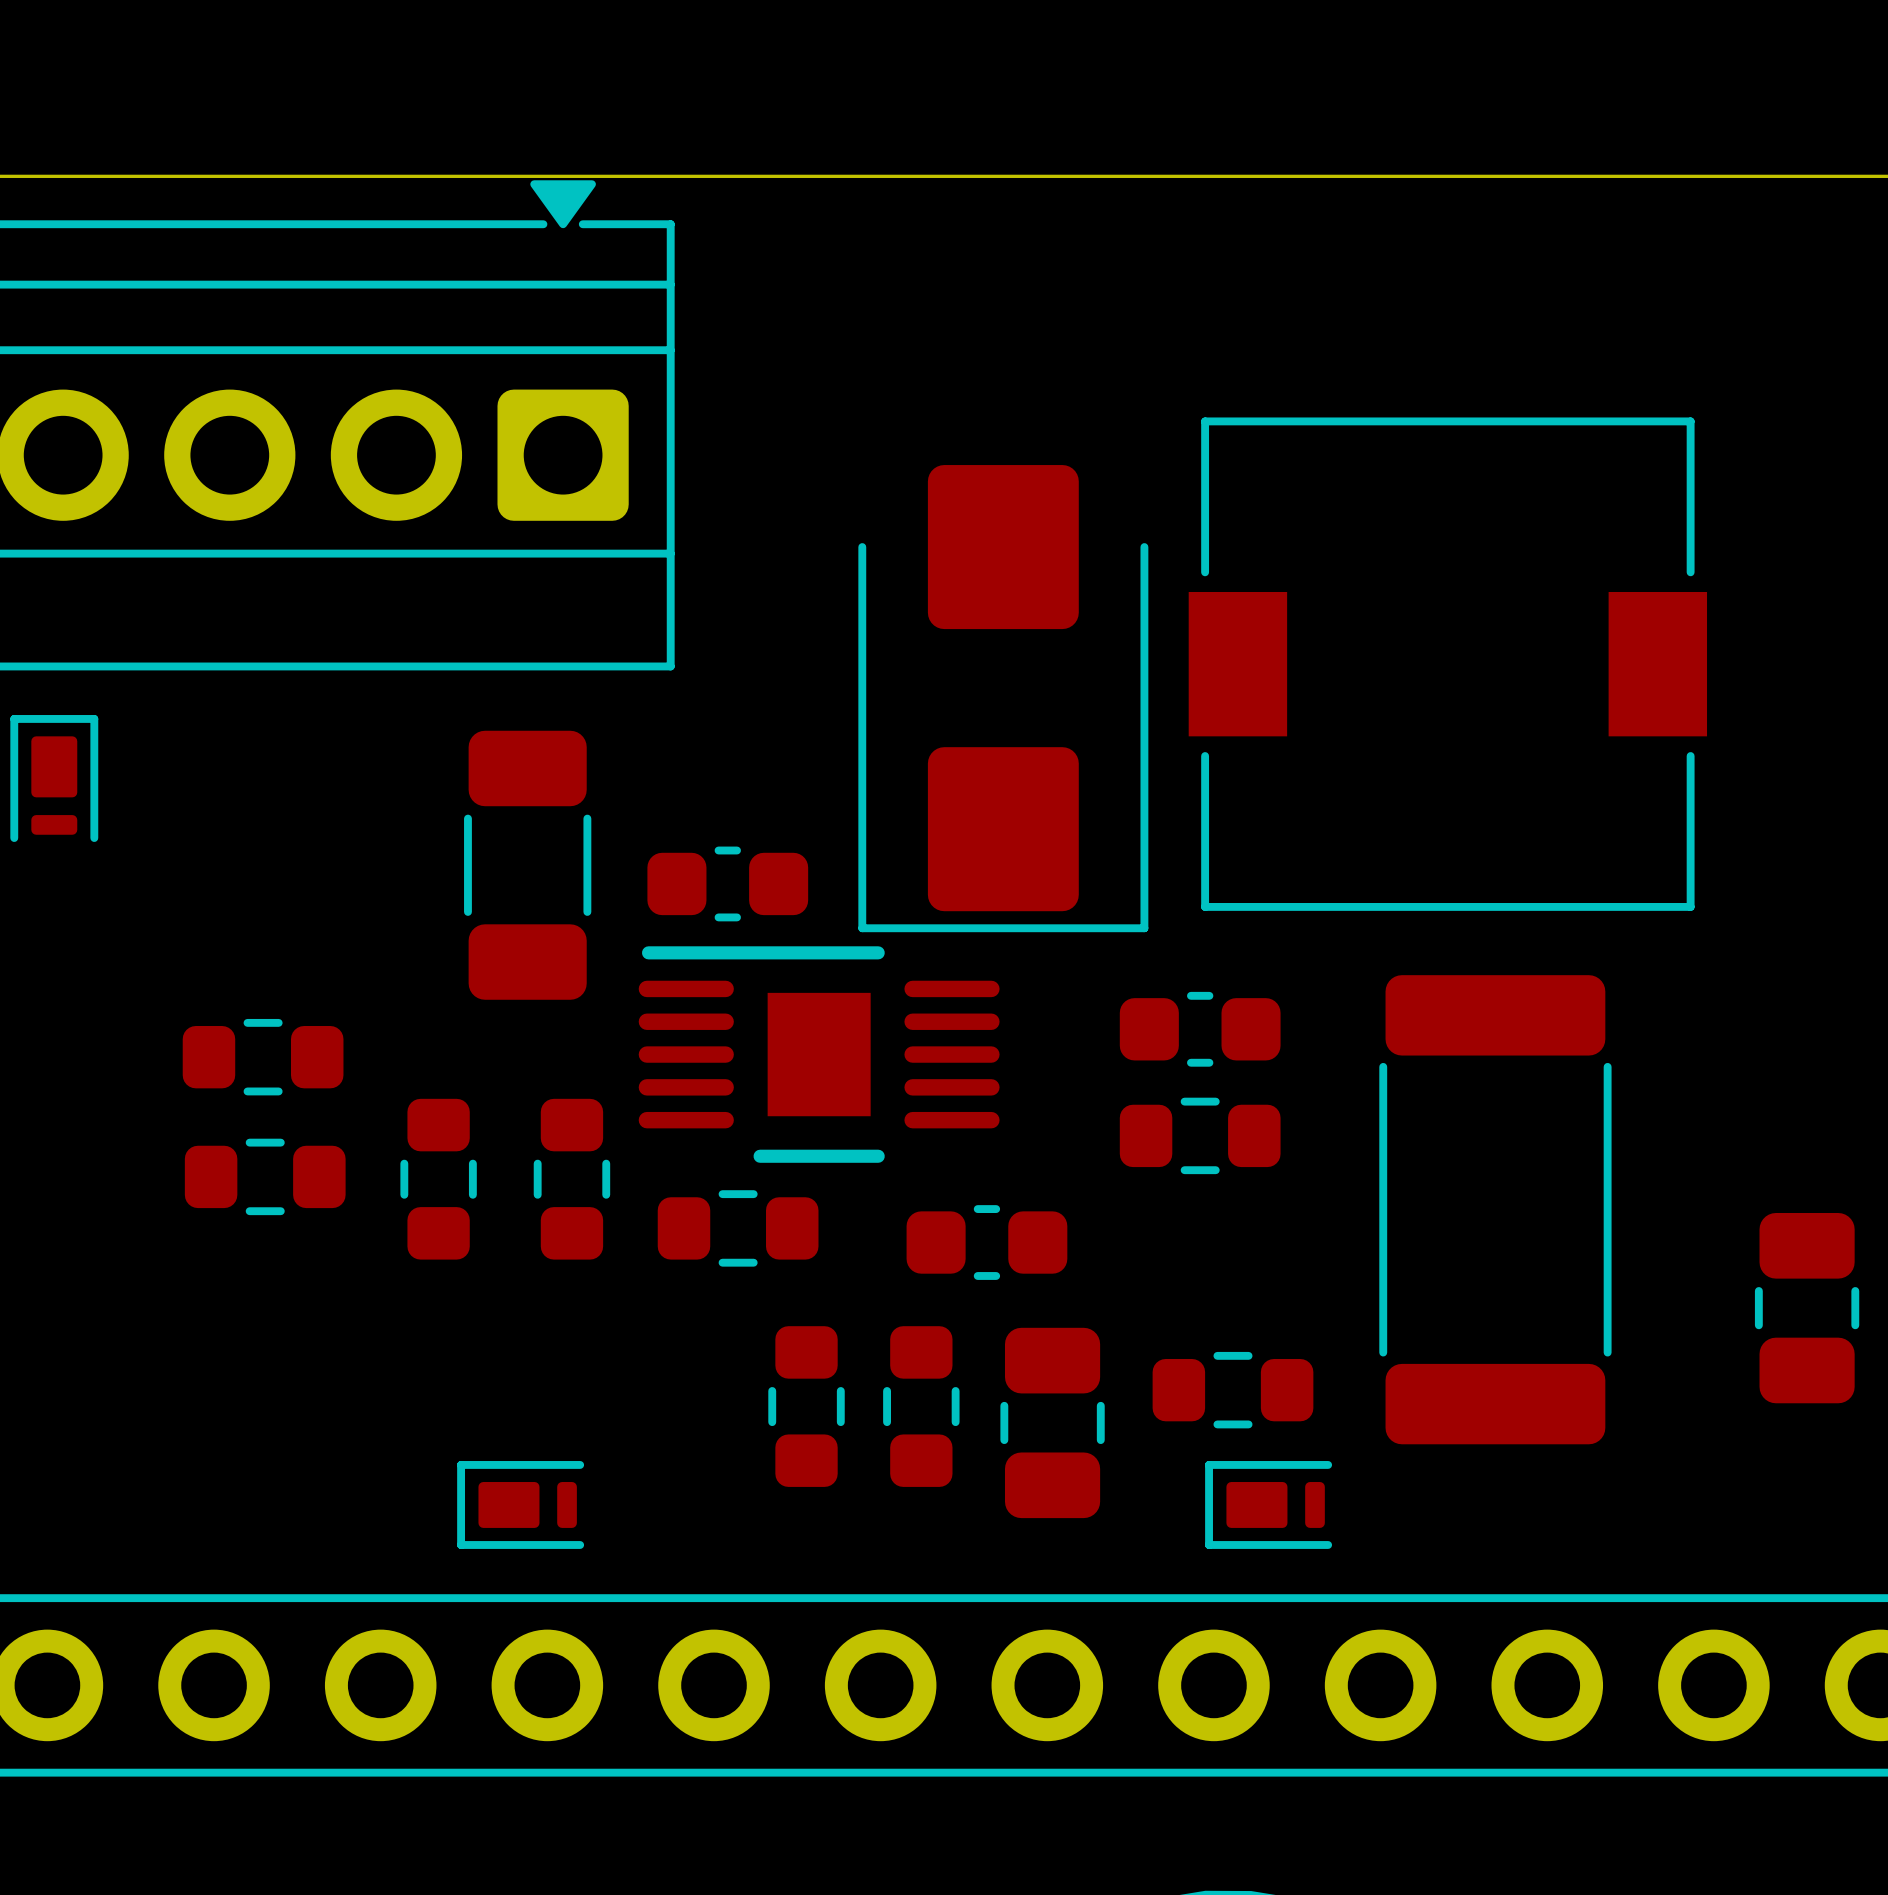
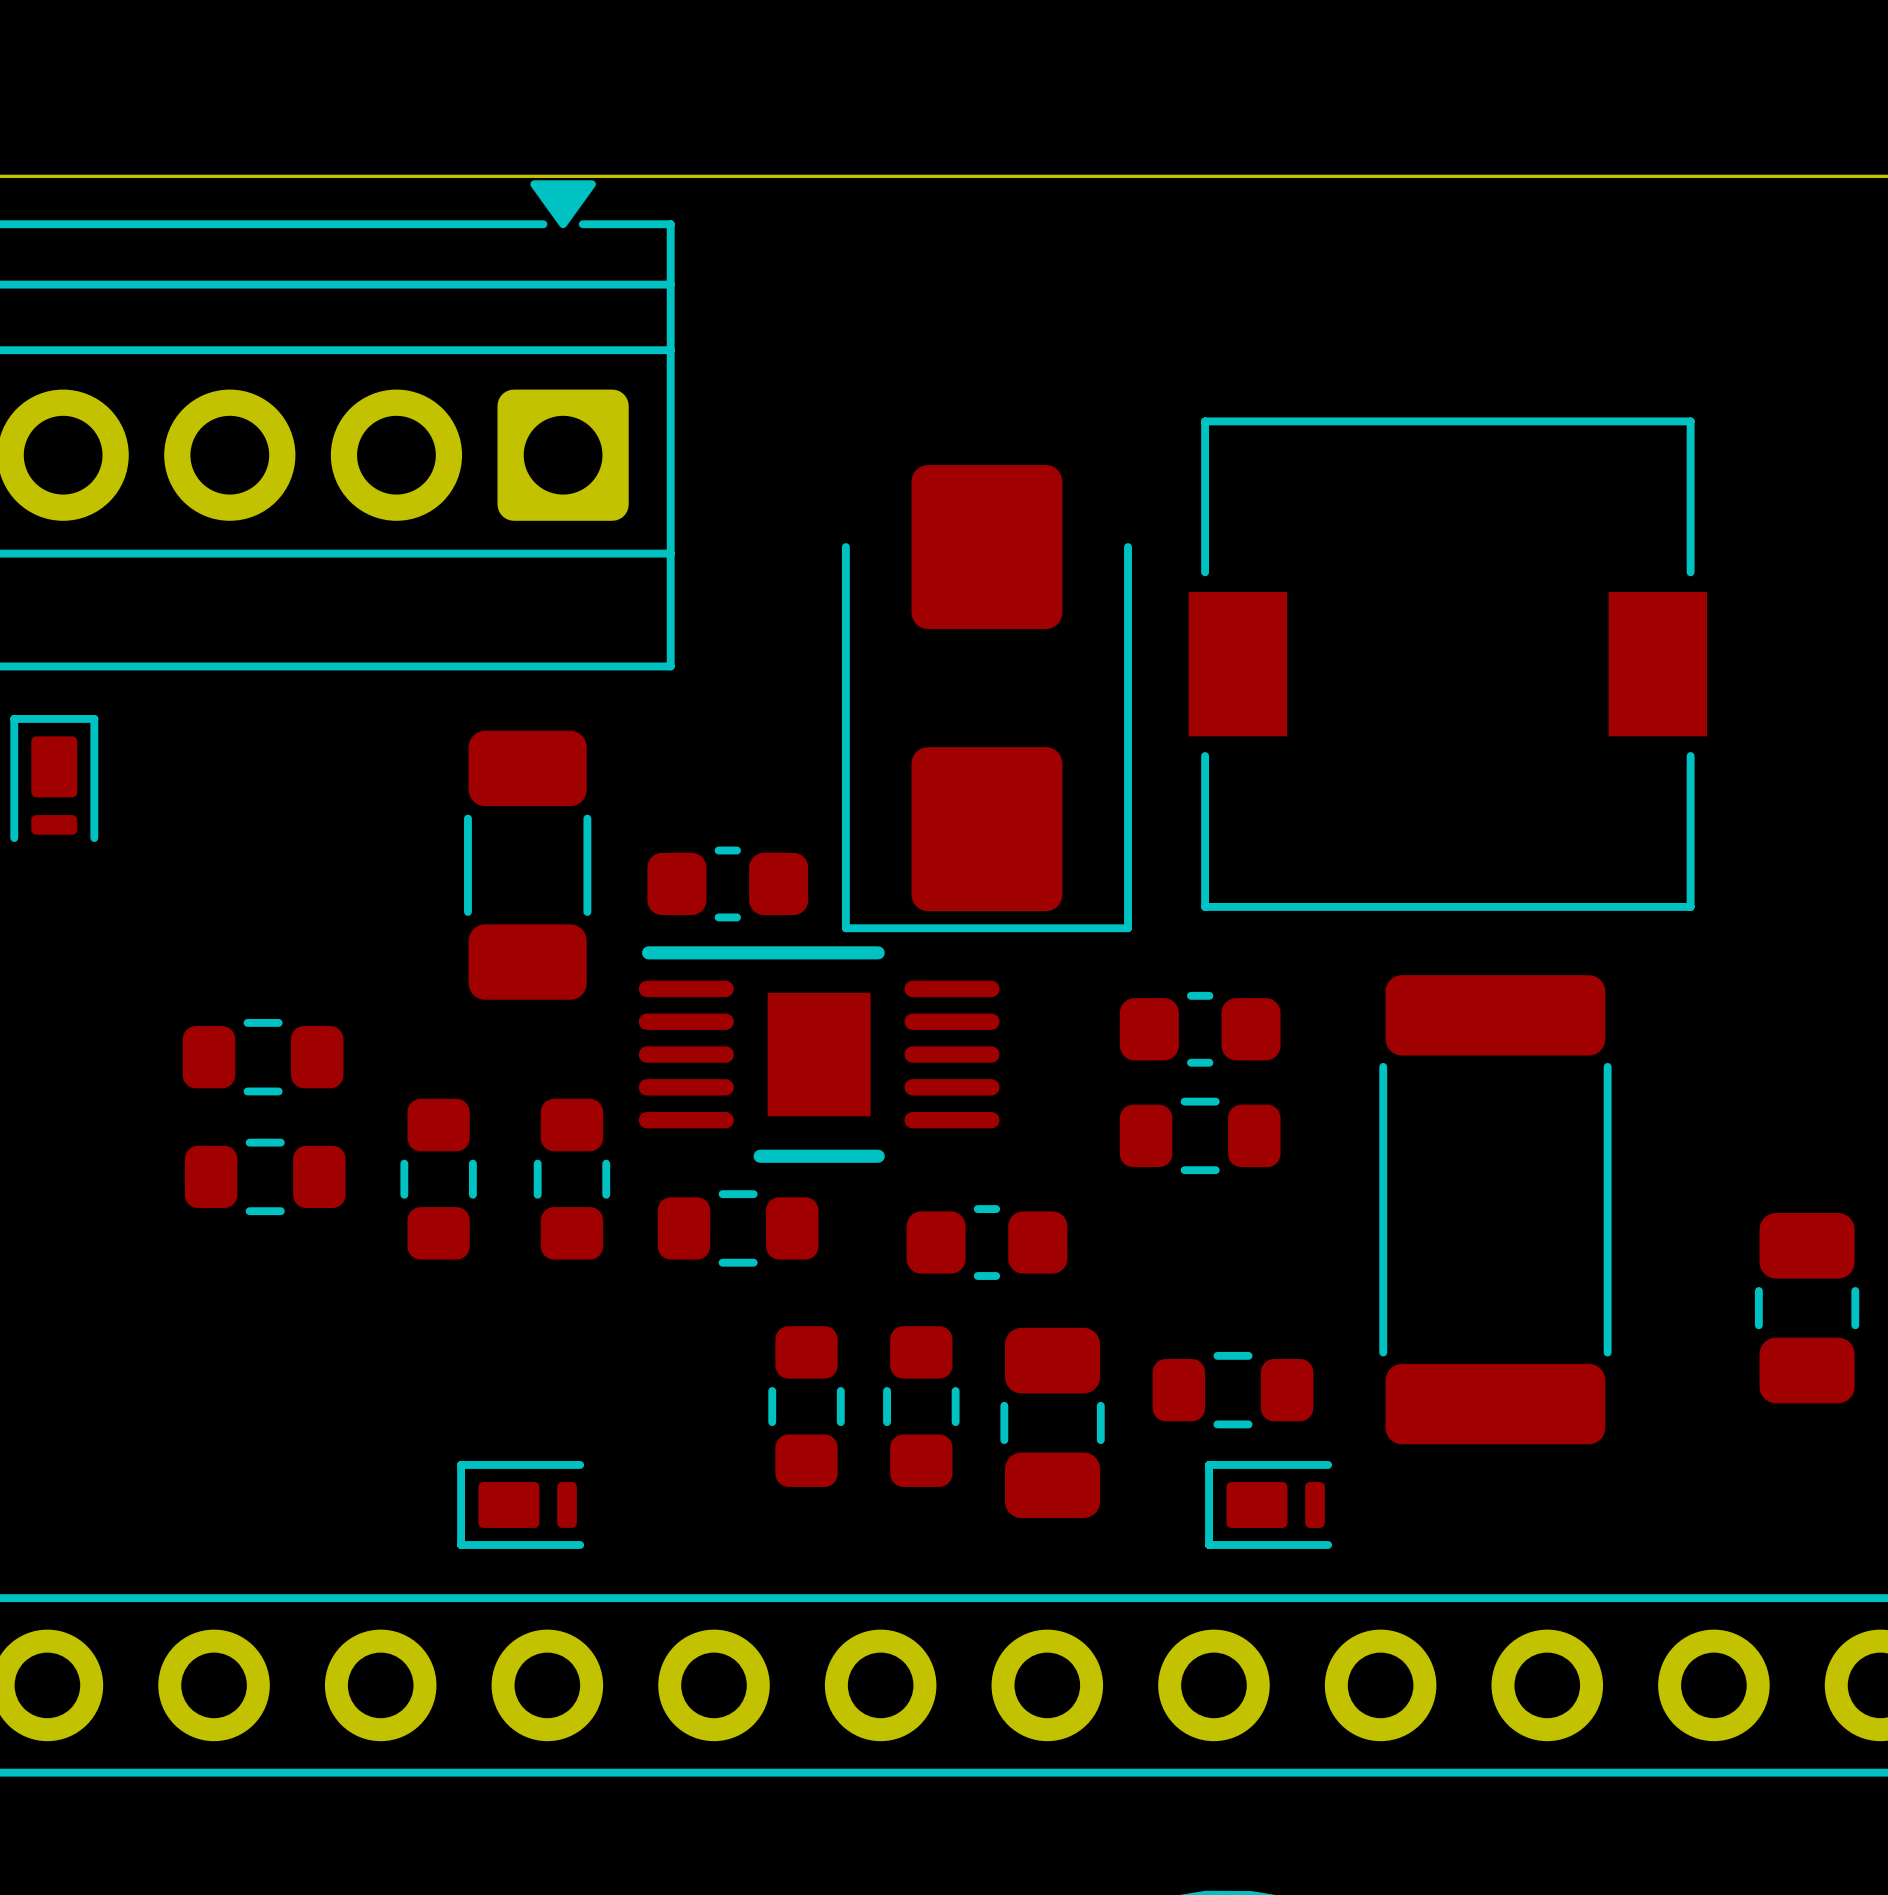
part position: (1003, 698) -> (986, 698)

